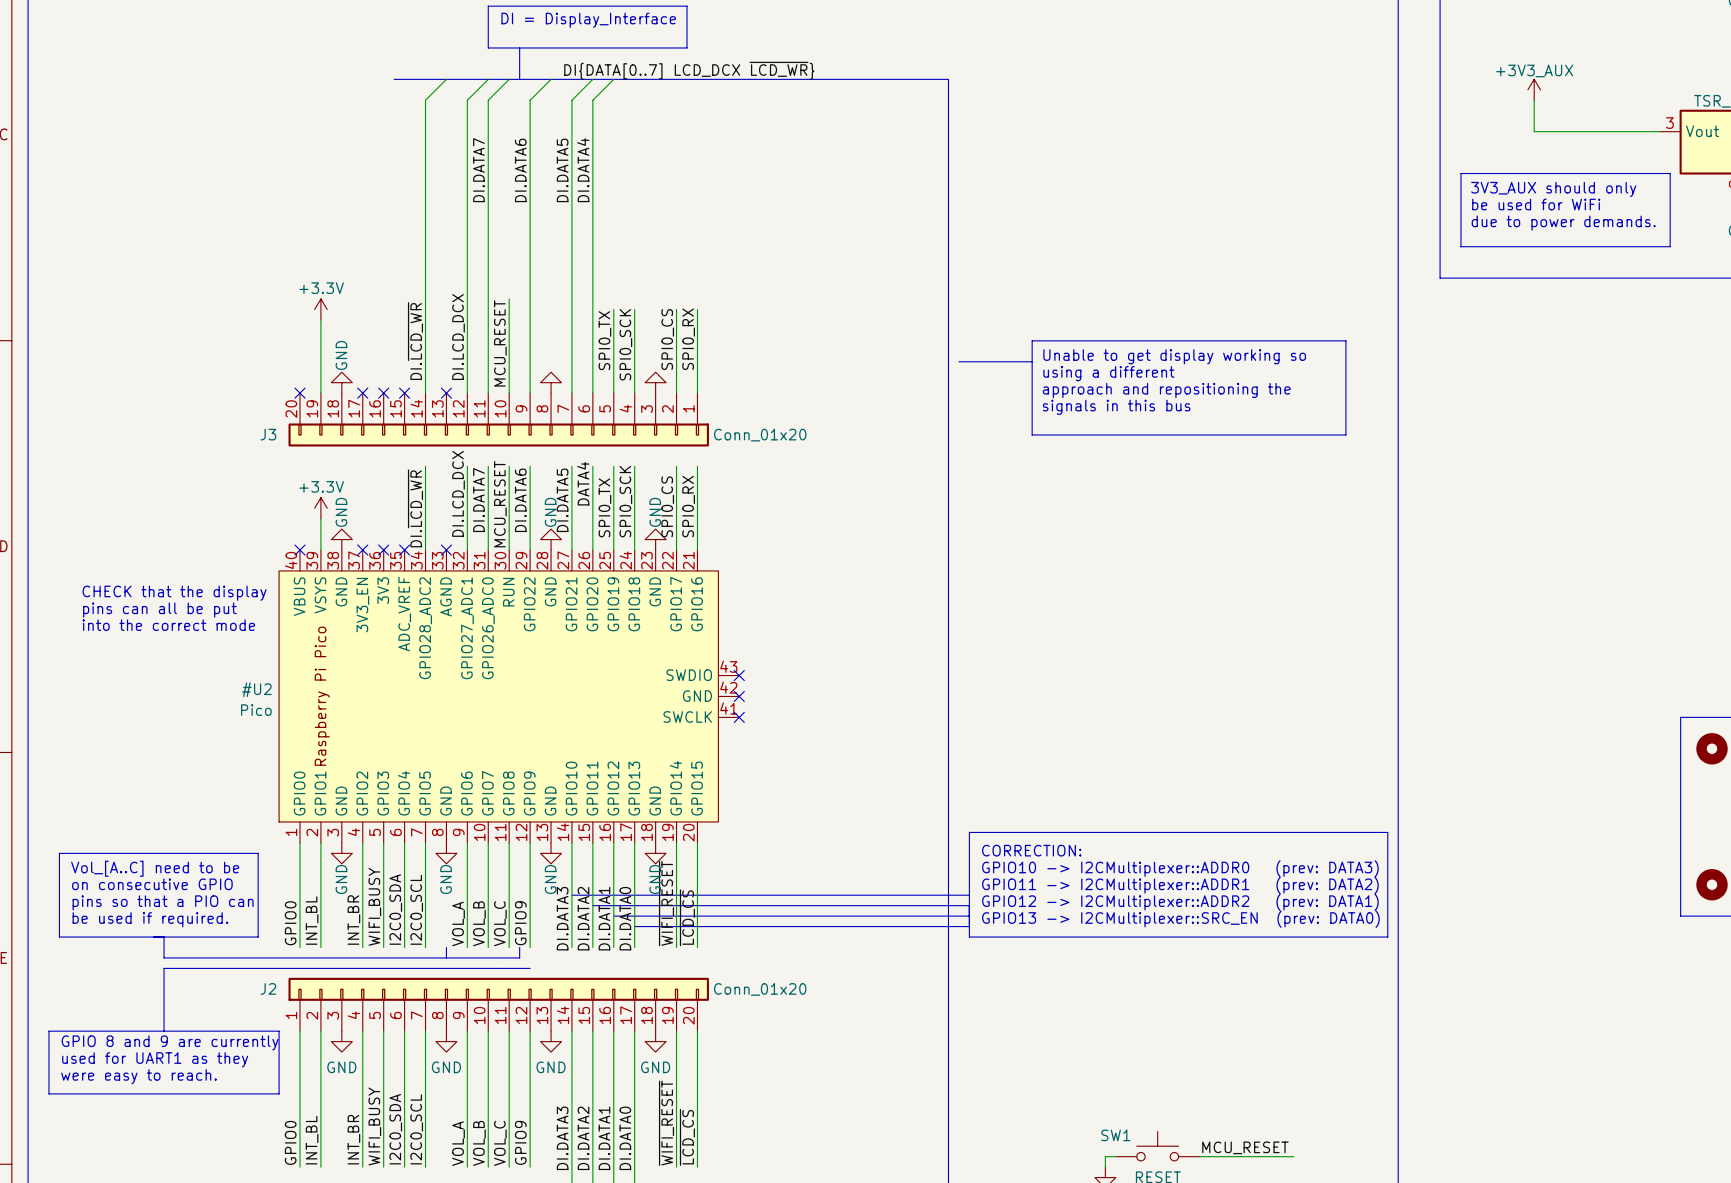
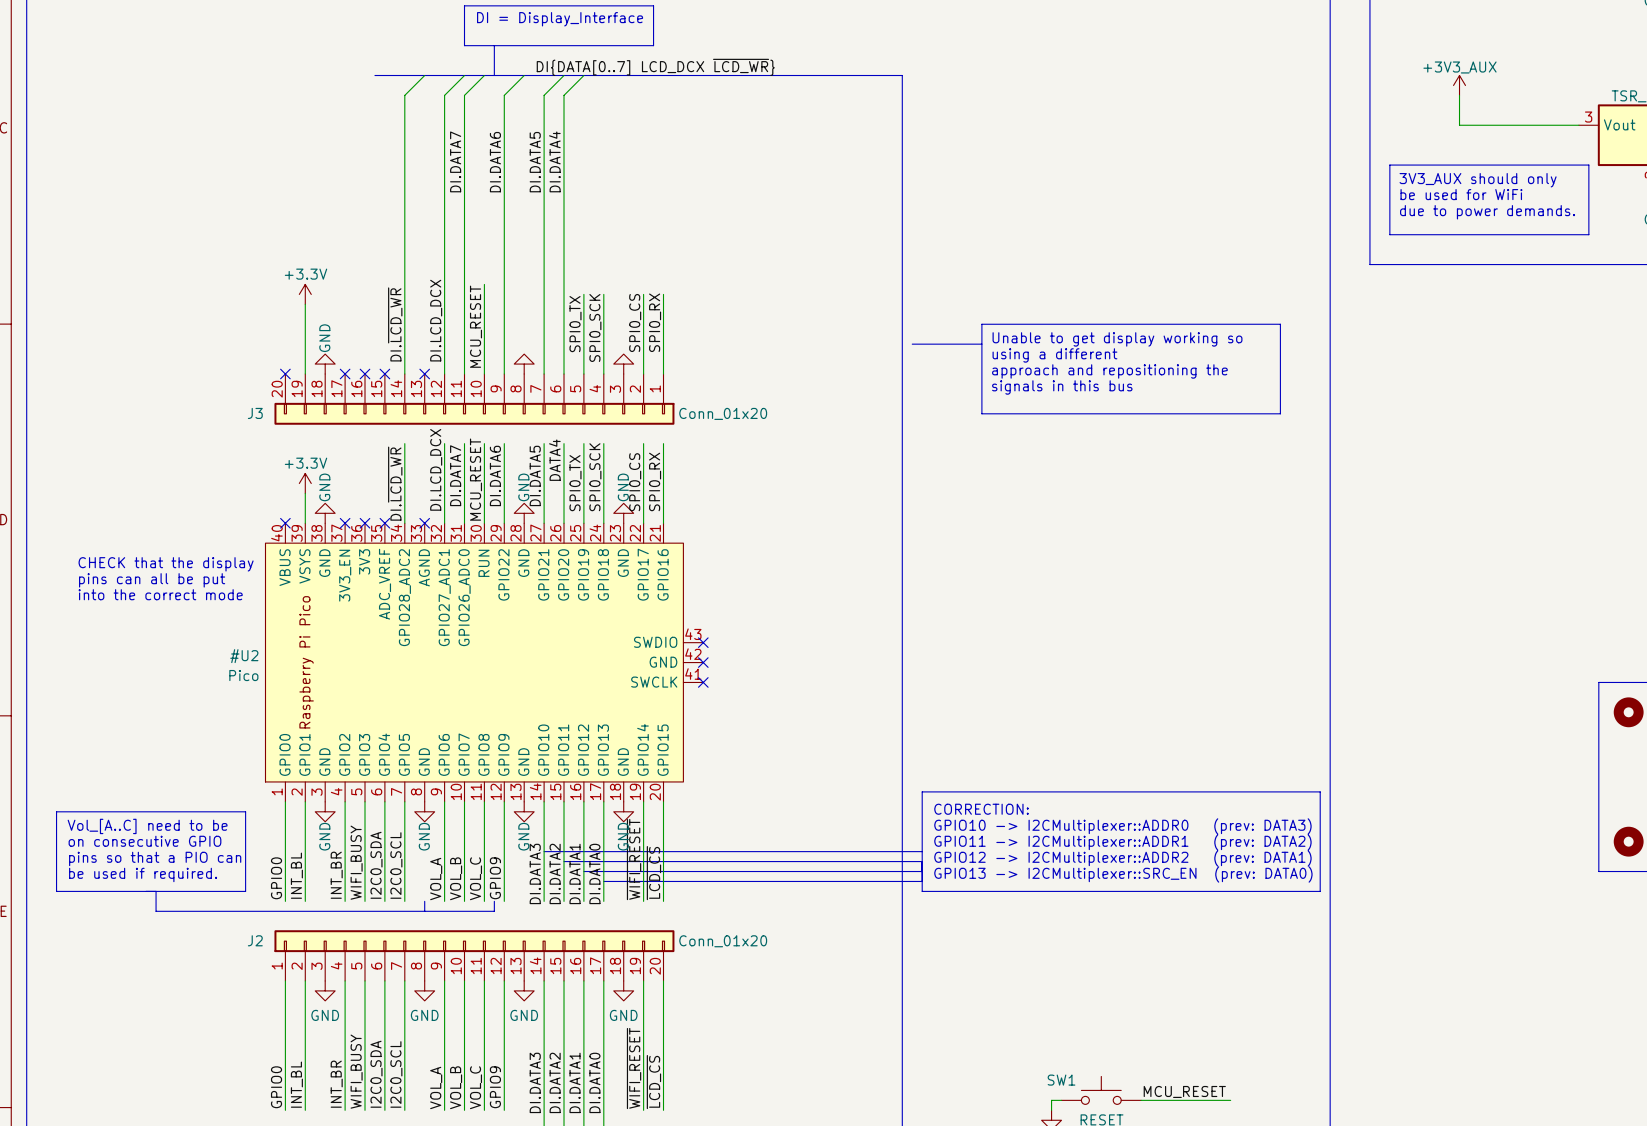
line: (530, 968) (164, 968) (164, 1031) -> none
line: (48, 1031) (279, 1031) (279, 1093) (48, 1093) (48, 1031) -> none
text: GPIO 8 and 9 are currently (170, 1042) -> none
text: used for UART1 as they (155, 1059) -> none
text: were easy to reach. (138, 1076) -> none

